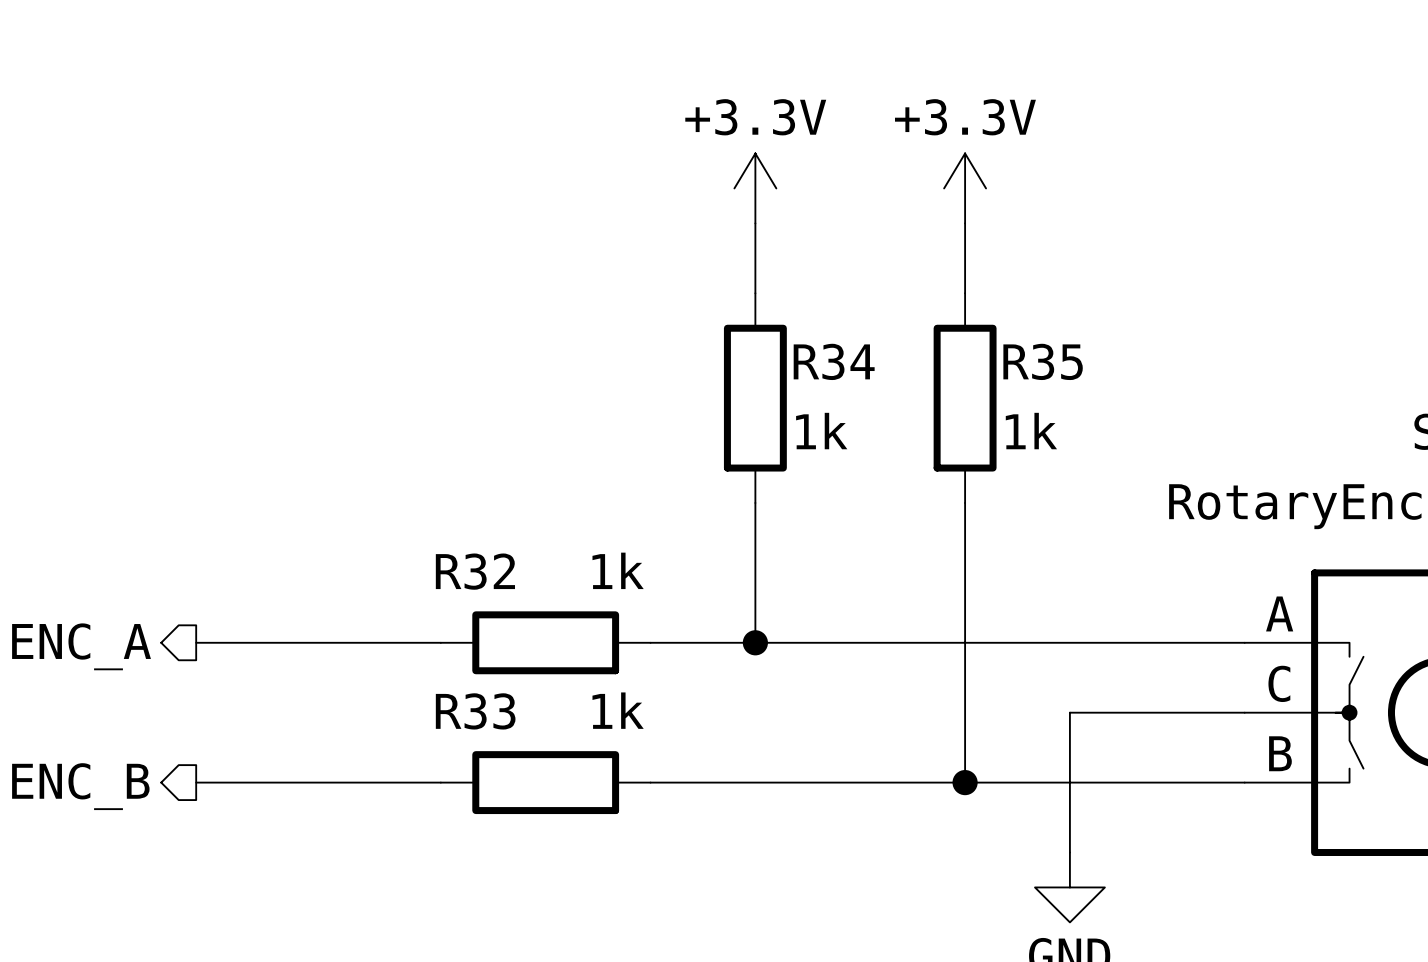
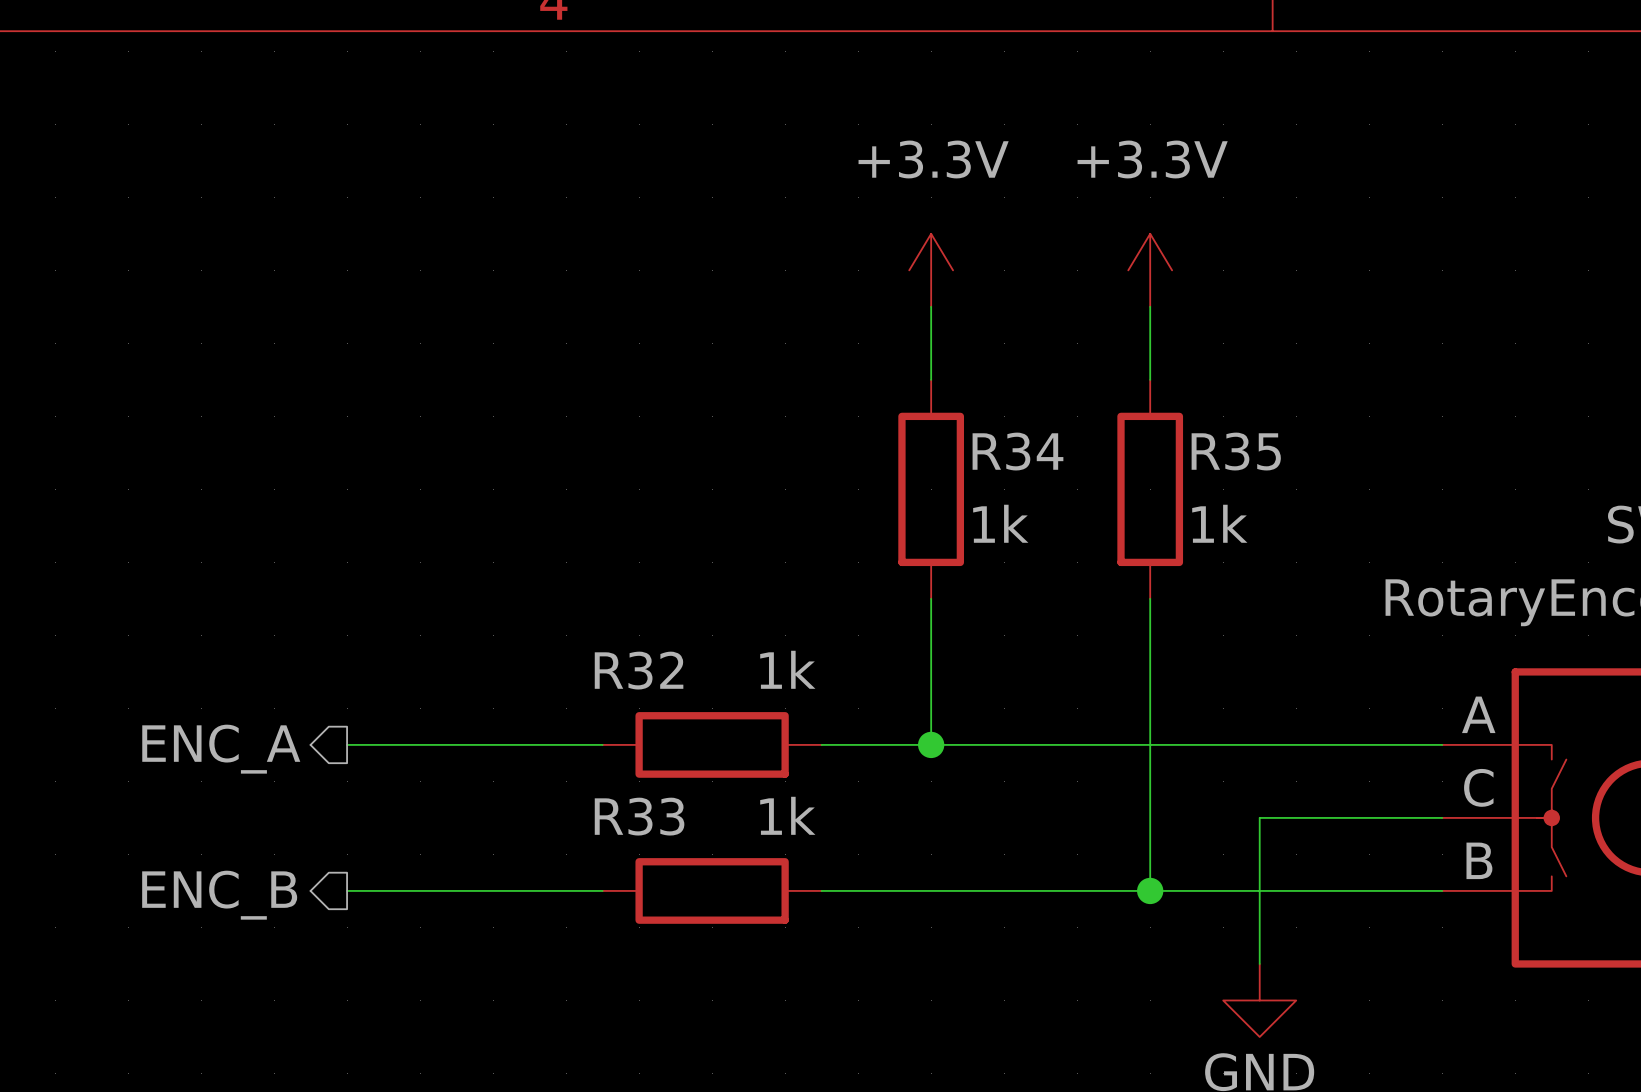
power symbol text position: +3.3V (755, 117) -> +3.3V (933, 159)
power symbol text position: +3.3V (965, 117) -> +3.3V (1152, 159)

